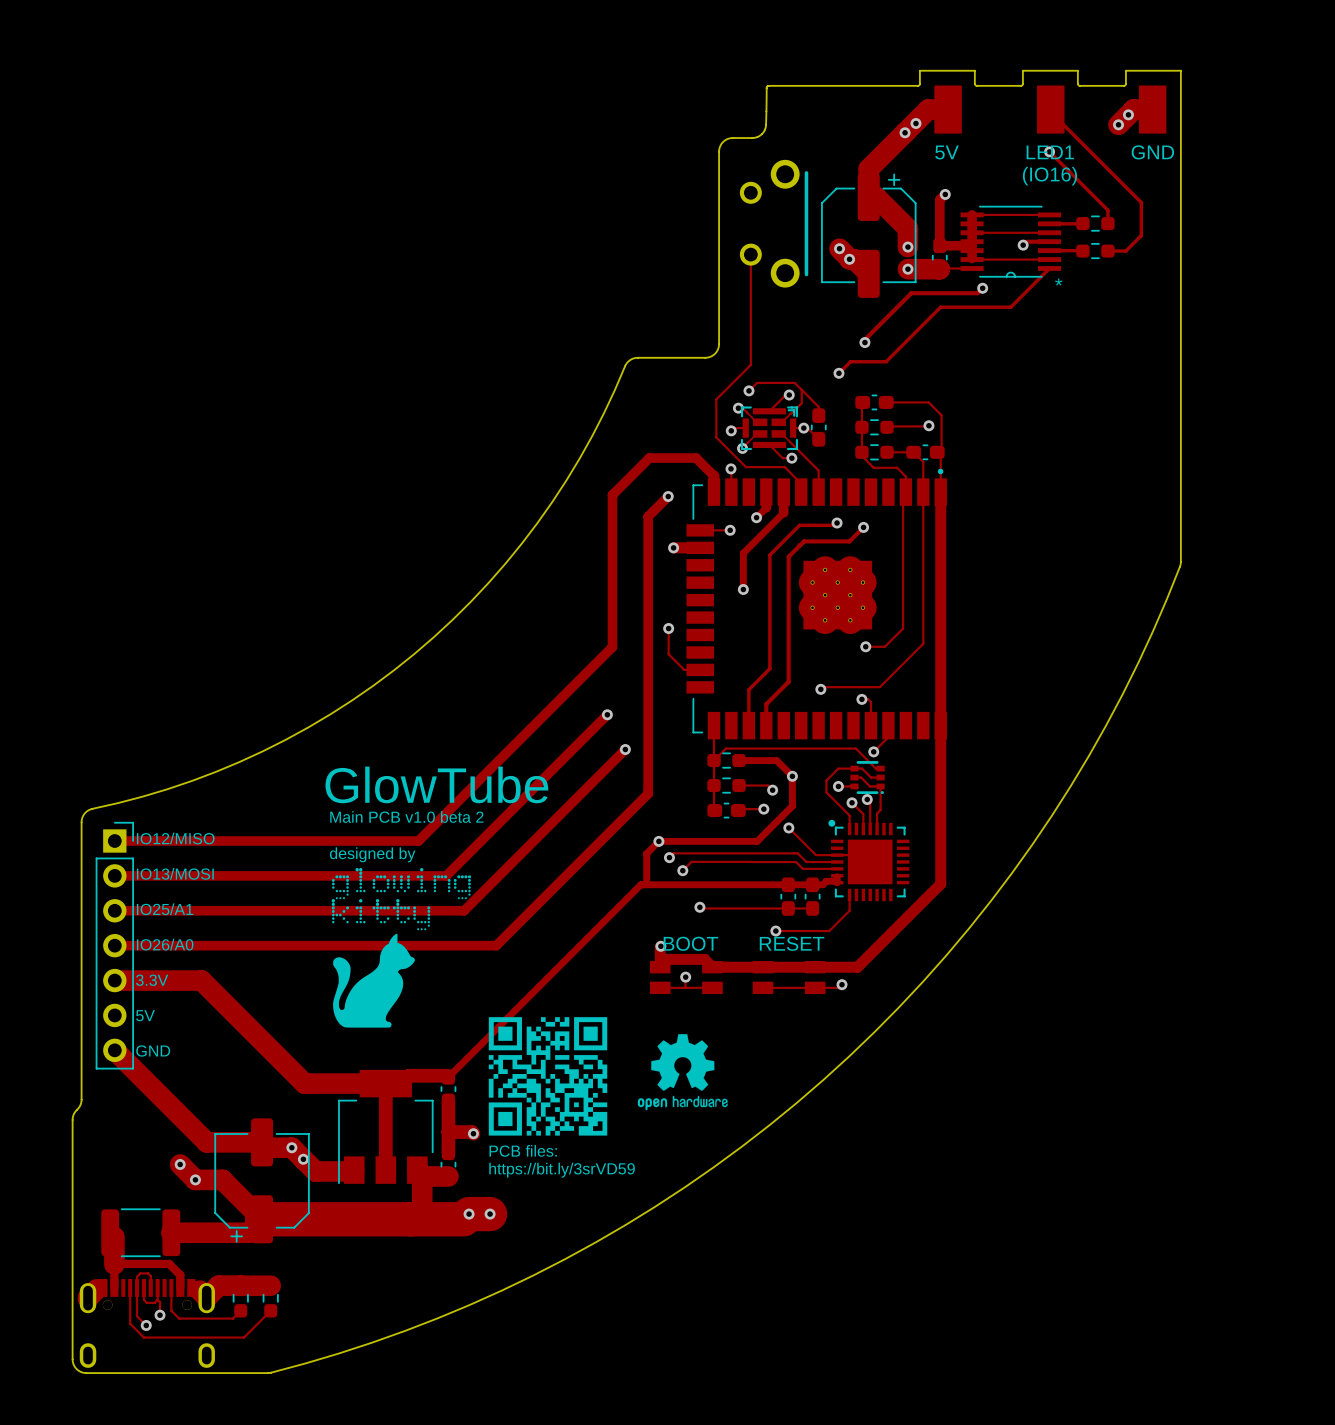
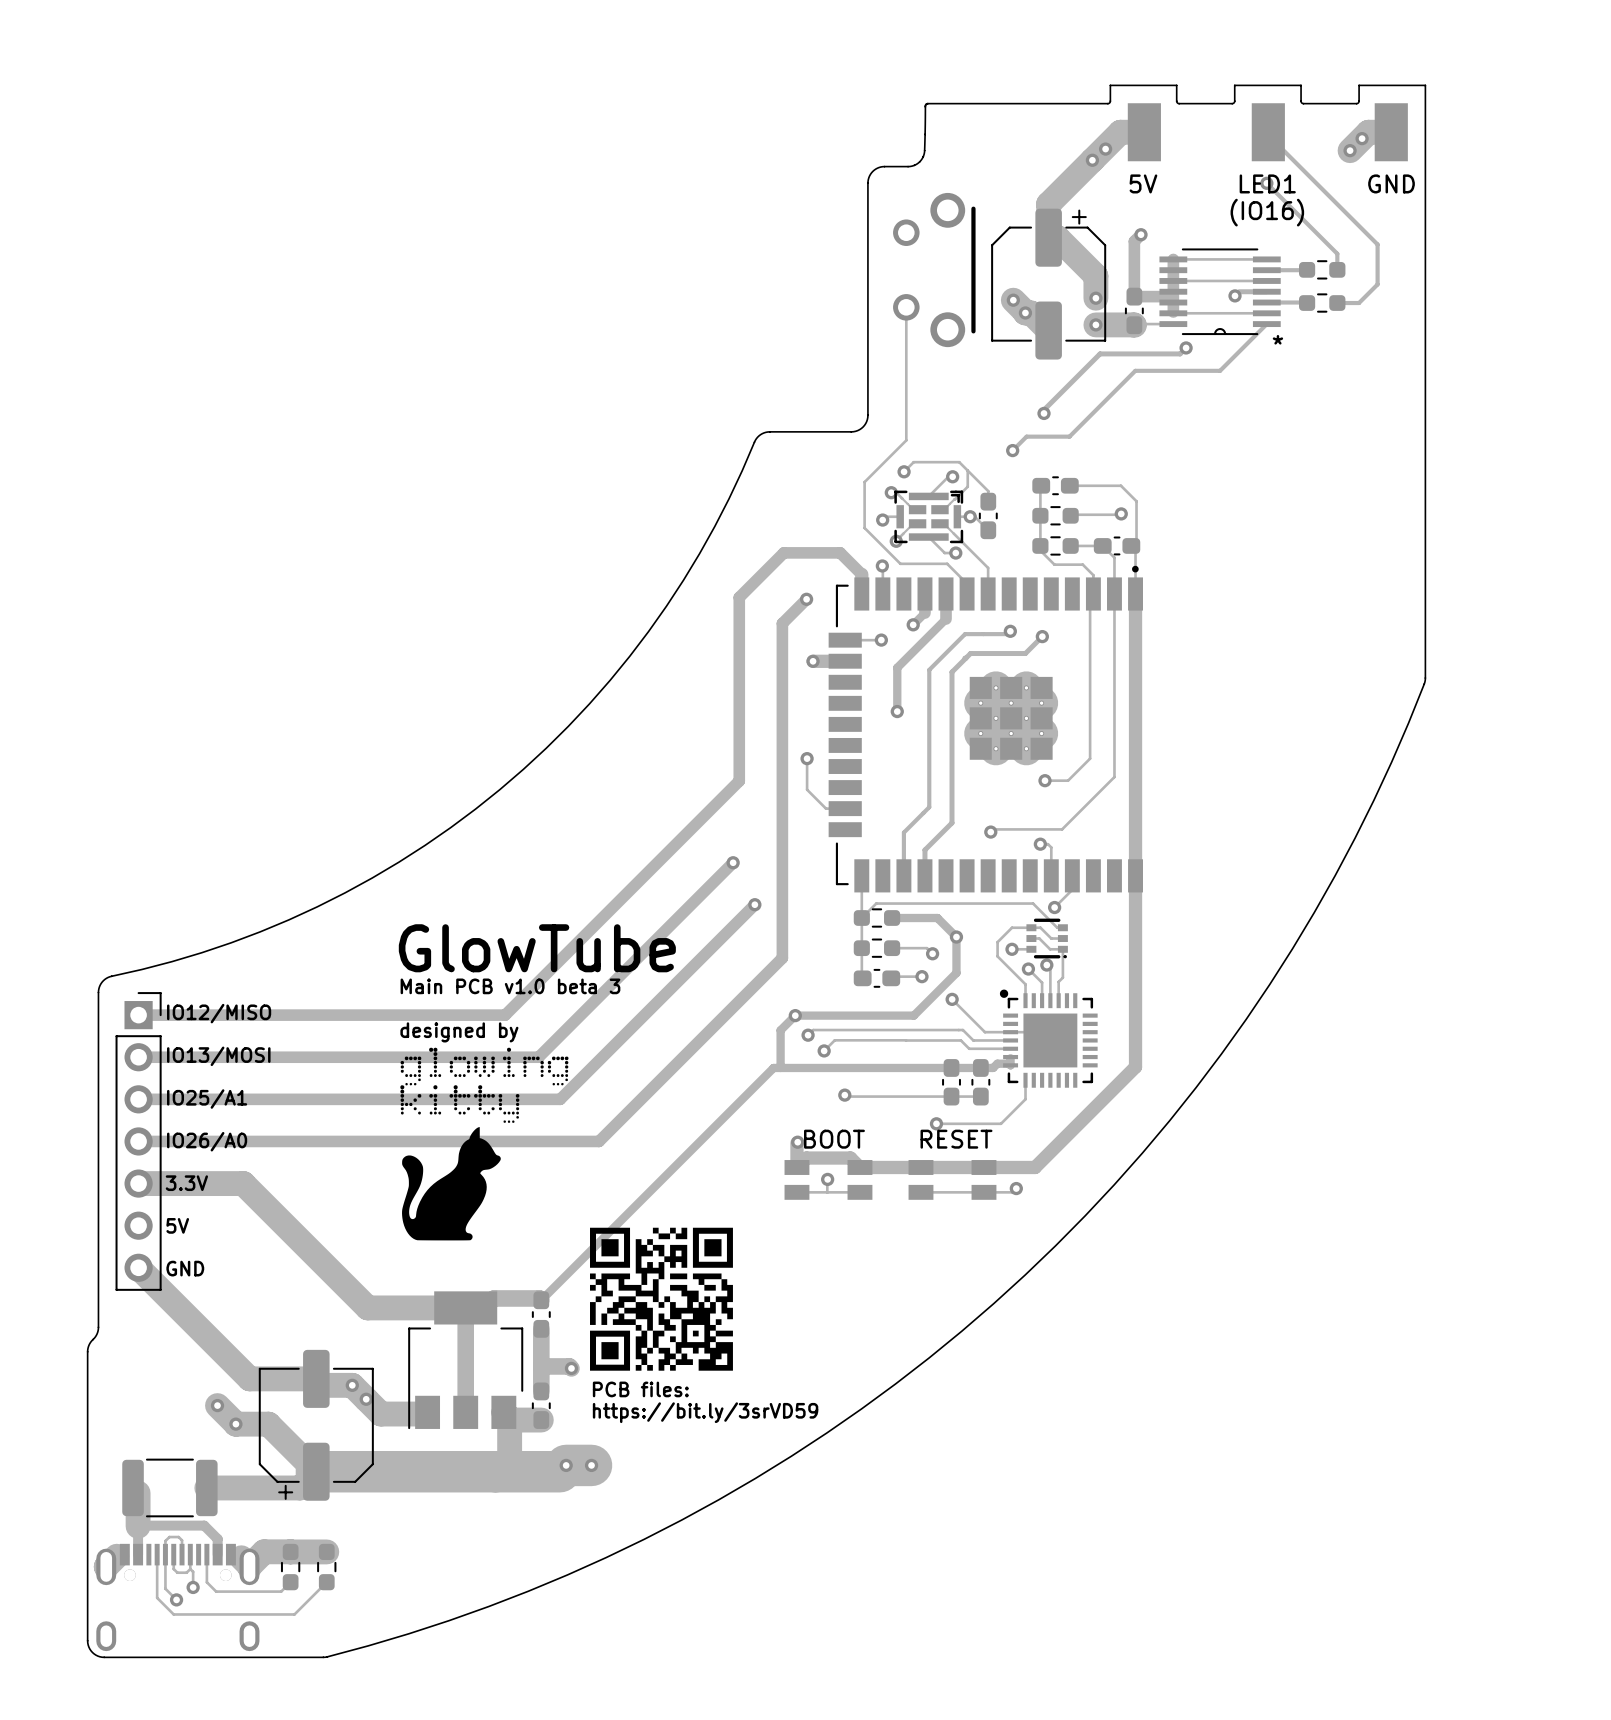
text: Main PCB v1.0 beta 2 (406, 816) -> Main PCB v1.0 beta 3 (510, 986)
drawing: [637, 1034, 728, 1111] -> none

